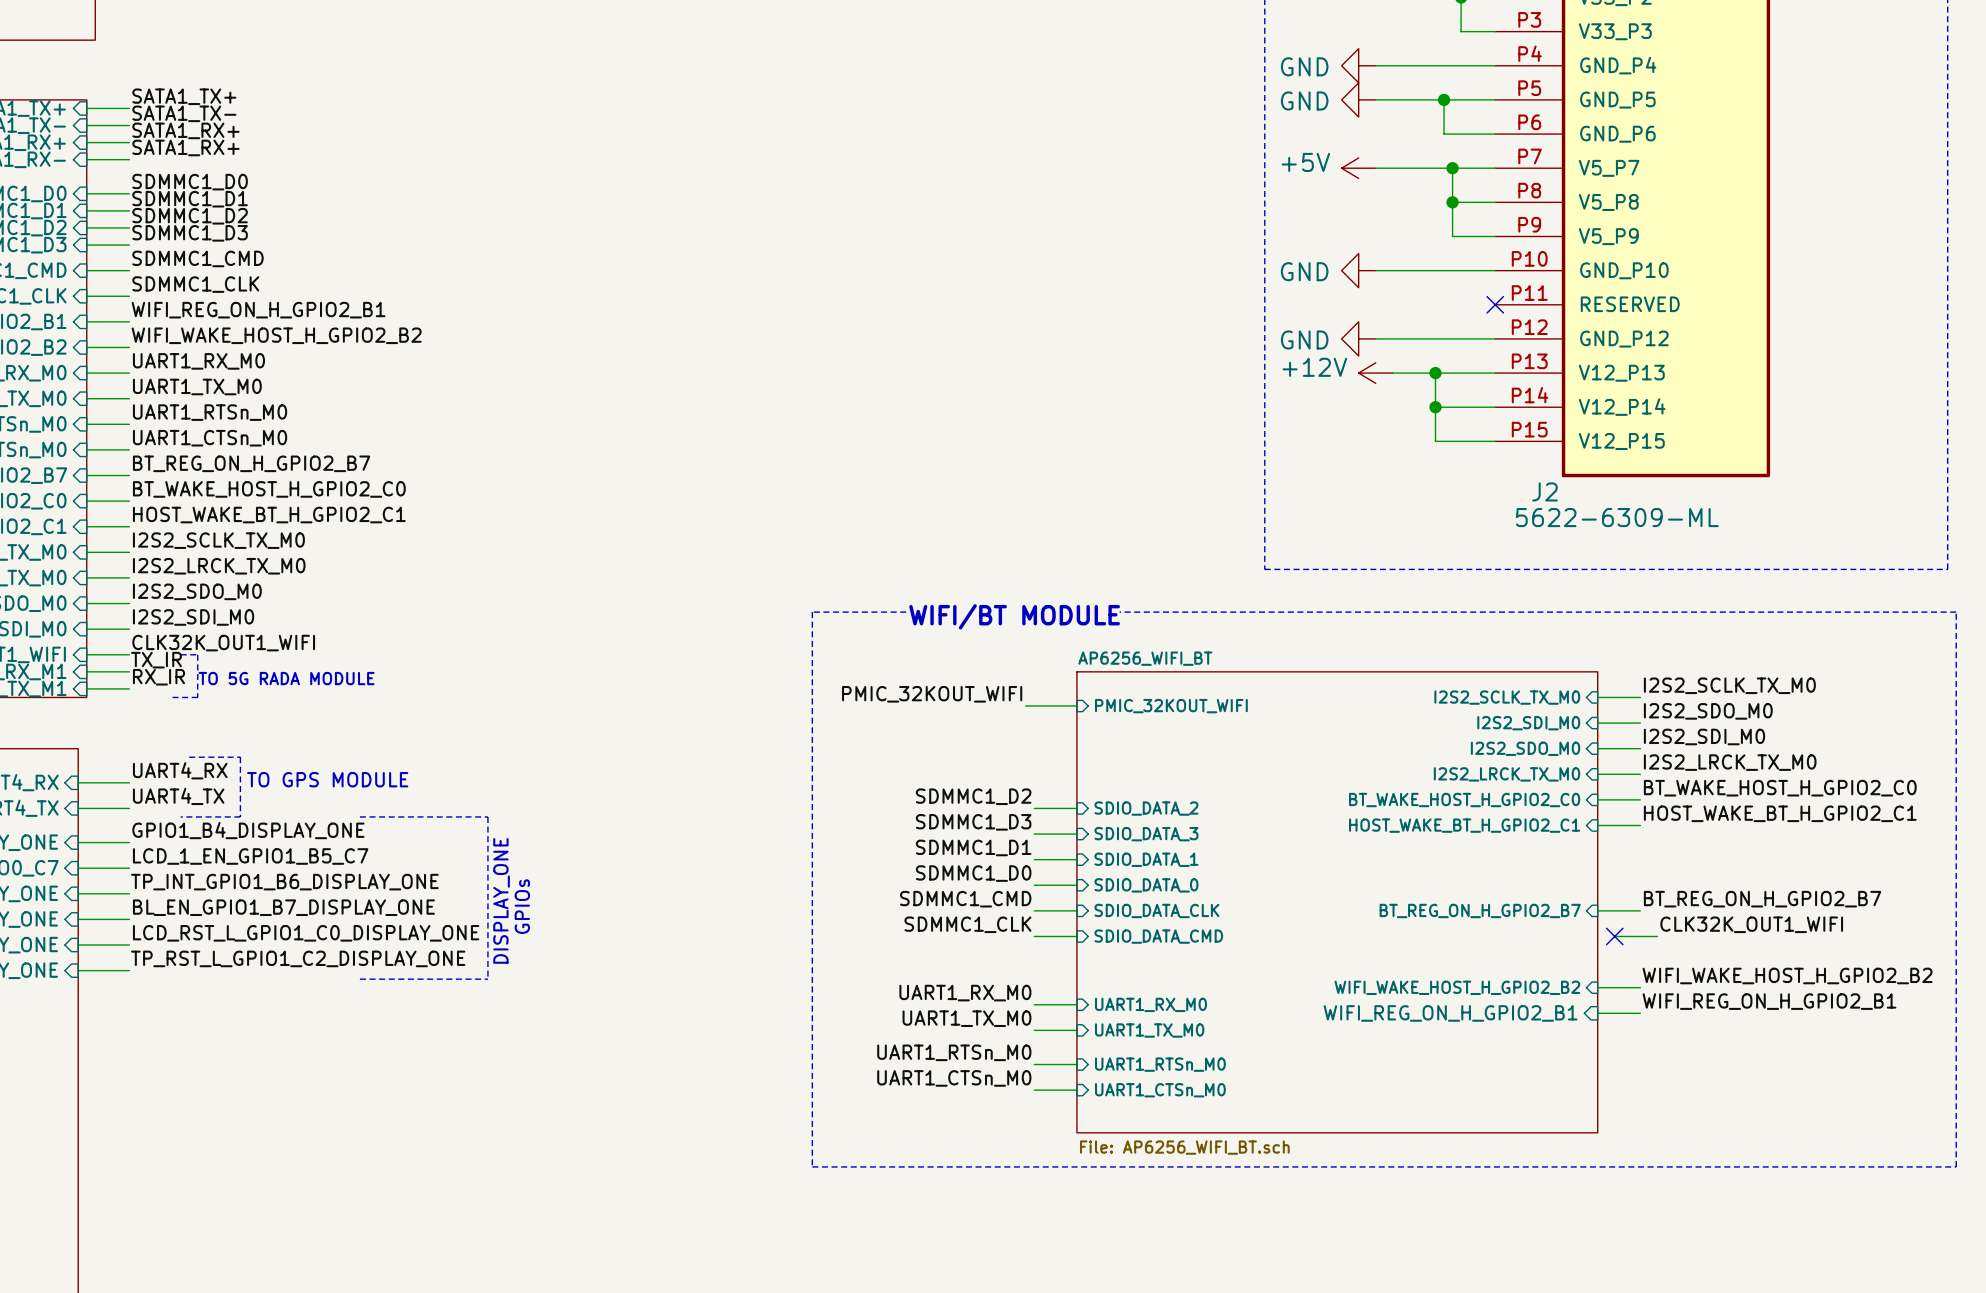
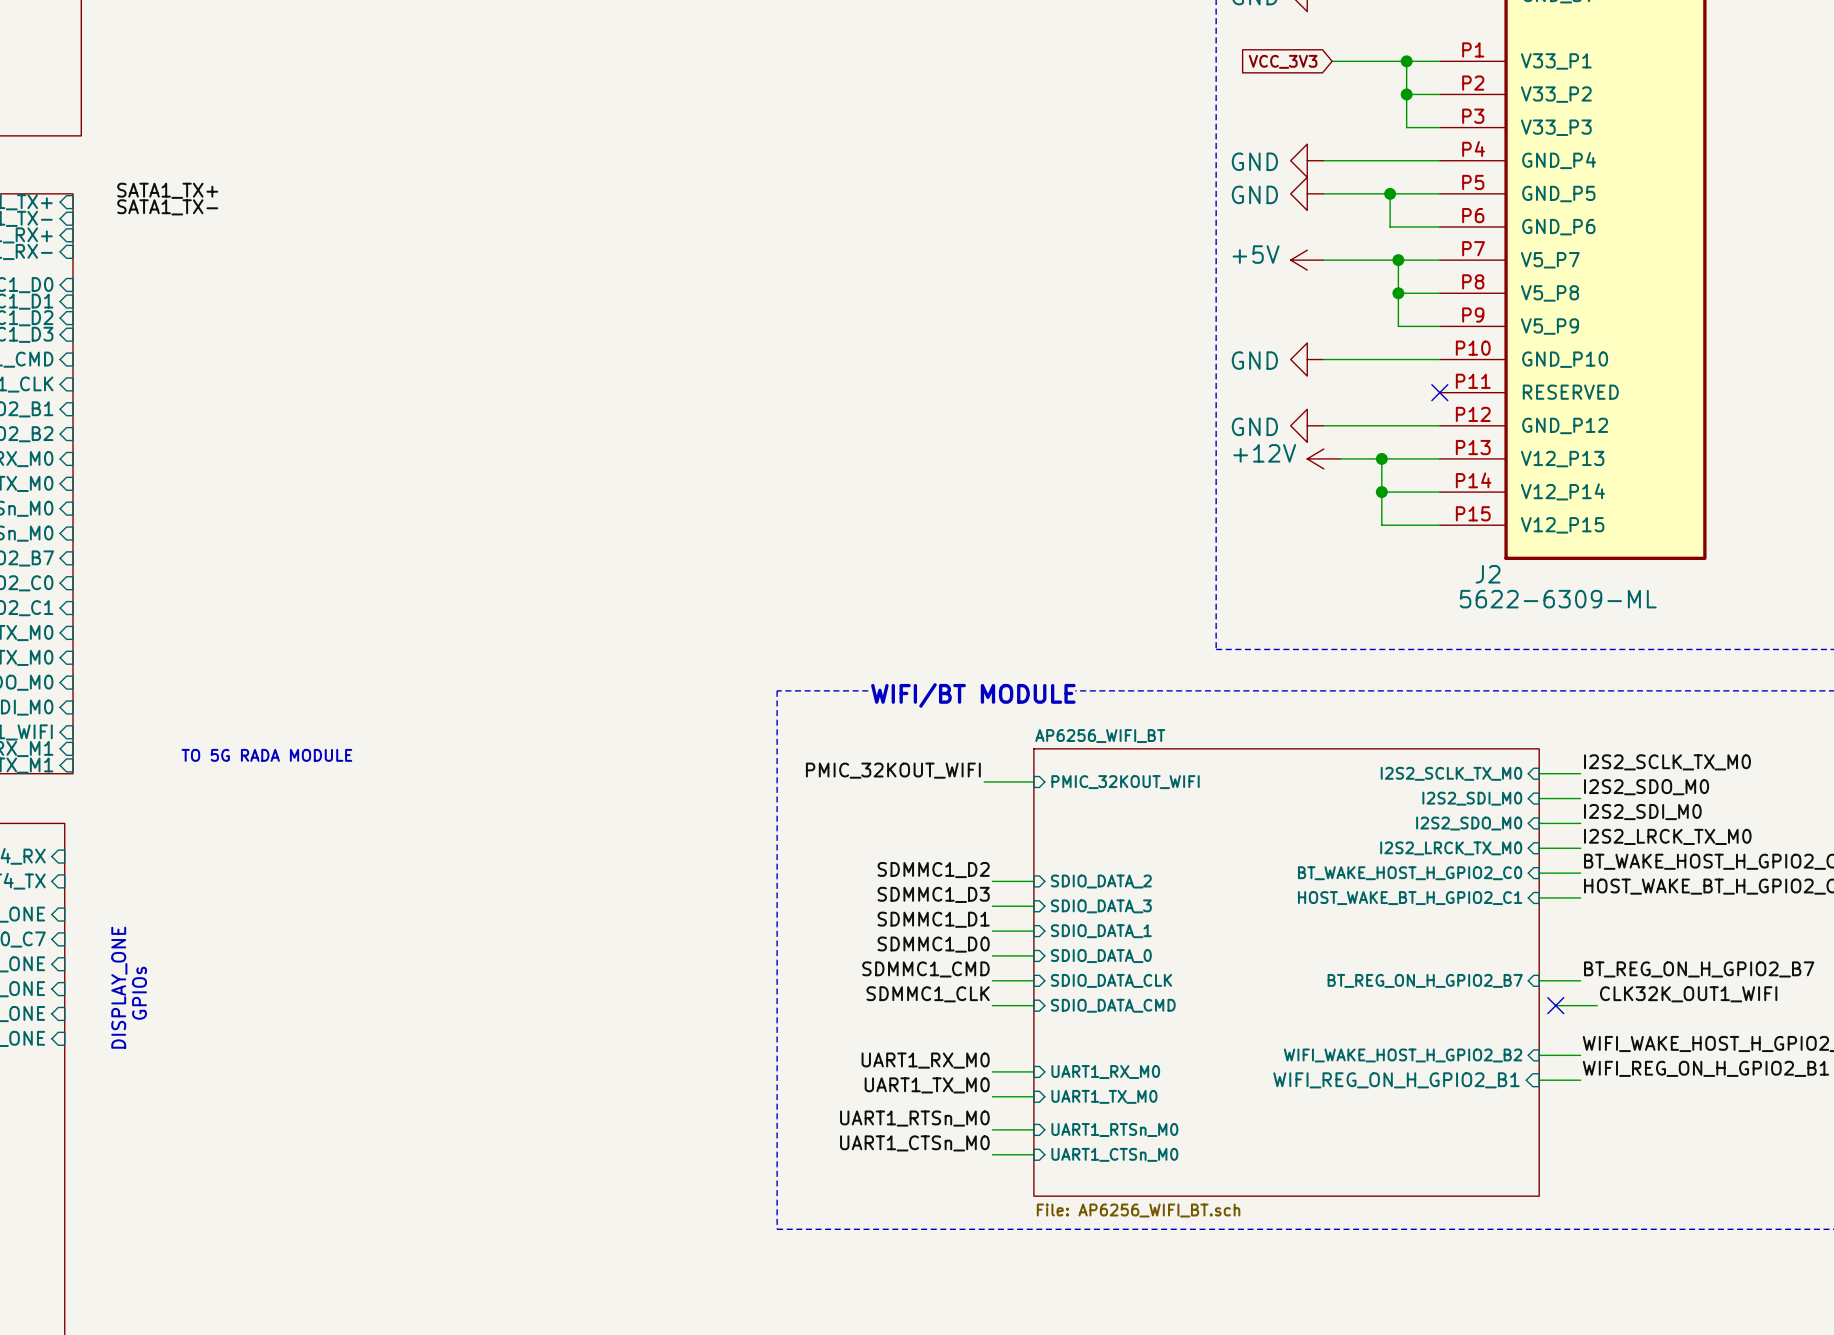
wire: (86, 108) (129, 108) -> none
wire: (86, 125) (129, 125) -> none
label: SATA1_RX+ (185, 130) -> none
wire: (86, 142) (129, 142) -> none
label: SATA1_RX+ (185, 147) -> none
wire: (86, 159) (129, 159) -> none
label: SDMMC1_D0 (190, 182) -> none
wire: (86, 193) (129, 193) -> none
label: SDMMC1_D1 (190, 199) -> none
wire: (86, 210) (129, 210) -> none
label: SDMMC1_D2 (190, 216) -> none
wire: (86, 227) (129, 227) -> none
label: SDMMC1_D3 (190, 233) -> none
wire: (86, 245) (129, 245) -> none
label: SDMMC1_CMD (197, 258) -> none
wire: (86, 270) (129, 270) -> none
label: SDMMC1_CLK (195, 284) -> none
wire: (86, 296) (129, 296) -> none
label: WIFI_REG_ON_H_GPIO2_B1 (258, 310) -> none
wire: (86, 321) (129, 321) -> none
label: WIFI_WAKE_HOST_H_GPIO2_B2 (276, 335) -> none
wire: (86, 347) (129, 347) -> none
label: UART1_RX_M0 (198, 361) -> none
wire: (86, 373) (129, 373) -> none
label: UART1_TX_M0 (197, 386) -> none
wire: (86, 398) (129, 398) -> none
label: UART1_RTSn_M0 (210, 412) -> none
wire: (86, 424) (129, 424) -> none
label: UART1_CTSn_M0 (210, 438) -> none
wire: (86, 449) (129, 449) -> none
label: BT_REG_ON_H_GPIO2_B7 (251, 463) -> none
wire: (86, 475) (129, 475) -> none
label: BT_WAKE_HOST_H_GPIO2_C0 (269, 489) -> none
wire: (86, 501) (129, 501) -> none
label: HOST_WAKE_BT_H_GPIO2_C1 (269, 515) -> none
wire: (86, 526) (129, 526) -> none
label: I2S2_SCLK_TX_M0 (218, 540) -> none
wire: (86, 552) (129, 552) -> none
label: I2S2_LRCK_TX_M0 (219, 566) -> none
wire: (86, 577) (129, 577) -> none
label: I2S2_SDO_M0 (197, 591) -> none
wire: (86, 603) (129, 603) -> none
label: I2S2_SDI_M0 (193, 617) -> none
wire: (86, 629) (129, 629) -> none
label: CLK32K_OUT1_WIFI (223, 643) -> none
wire: (86, 654) (129, 654) -> none
line: (180, 654) (197, 654) (197, 697) (172, 697) -> none
label: TX_IR (156, 660) -> none
wire: (86, 671) (129, 671) -> none
label: RX_IR (158, 677) -> none
wire: (86, 688) (129, 688) -> none
line: (189, 757) (240, 757) (240, 816) (180, 816) -> none
label: UART4_RX (180, 770) -> none
text: TO GPS MODULE (327, 779) -> none
wire: (78, 782) (129, 782) -> none
label: UART4_TX (178, 796) -> none
wire: (78, 808) (129, 808) -> none
line: (359, 816) (487, 816) (487, 979) (359, 979) -> none
label: GPIO1_B4_DISPLAY_ONE (248, 830) -> none
wire: (78, 842) (129, 842) -> none
label: LCD_1_EN_GPIO1_B5_C7 (250, 856) -> none
wire: (78, 868) (129, 868) -> none
label: TP_INT_GPIO1_B6_DISPLAY_ONE (284, 882) -> none
wire: (78, 893) (129, 893) -> none
text: DISPLAY_ONE (501, 900) -> none
text: GPIOs (522, 906) -> none
label: BL_EN_GPIO1_B7_DISPLAY_ONE (283, 907) -> none
text: none -> DISPLAY_ONE (119, 987)
wire: (78, 919) (129, 919) -> none
text: none -> GPIOs (139, 993)
label: LCD_RST_L_GPIO1_C0_DISPLAY_ONE (306, 933) -> none
wire: (78, 945) (129, 945) -> none
label: TP_RST_L_GPIO1_C2_DISPLAY_ONE (298, 958) -> none
wire: (78, 970) (129, 970) -> none

